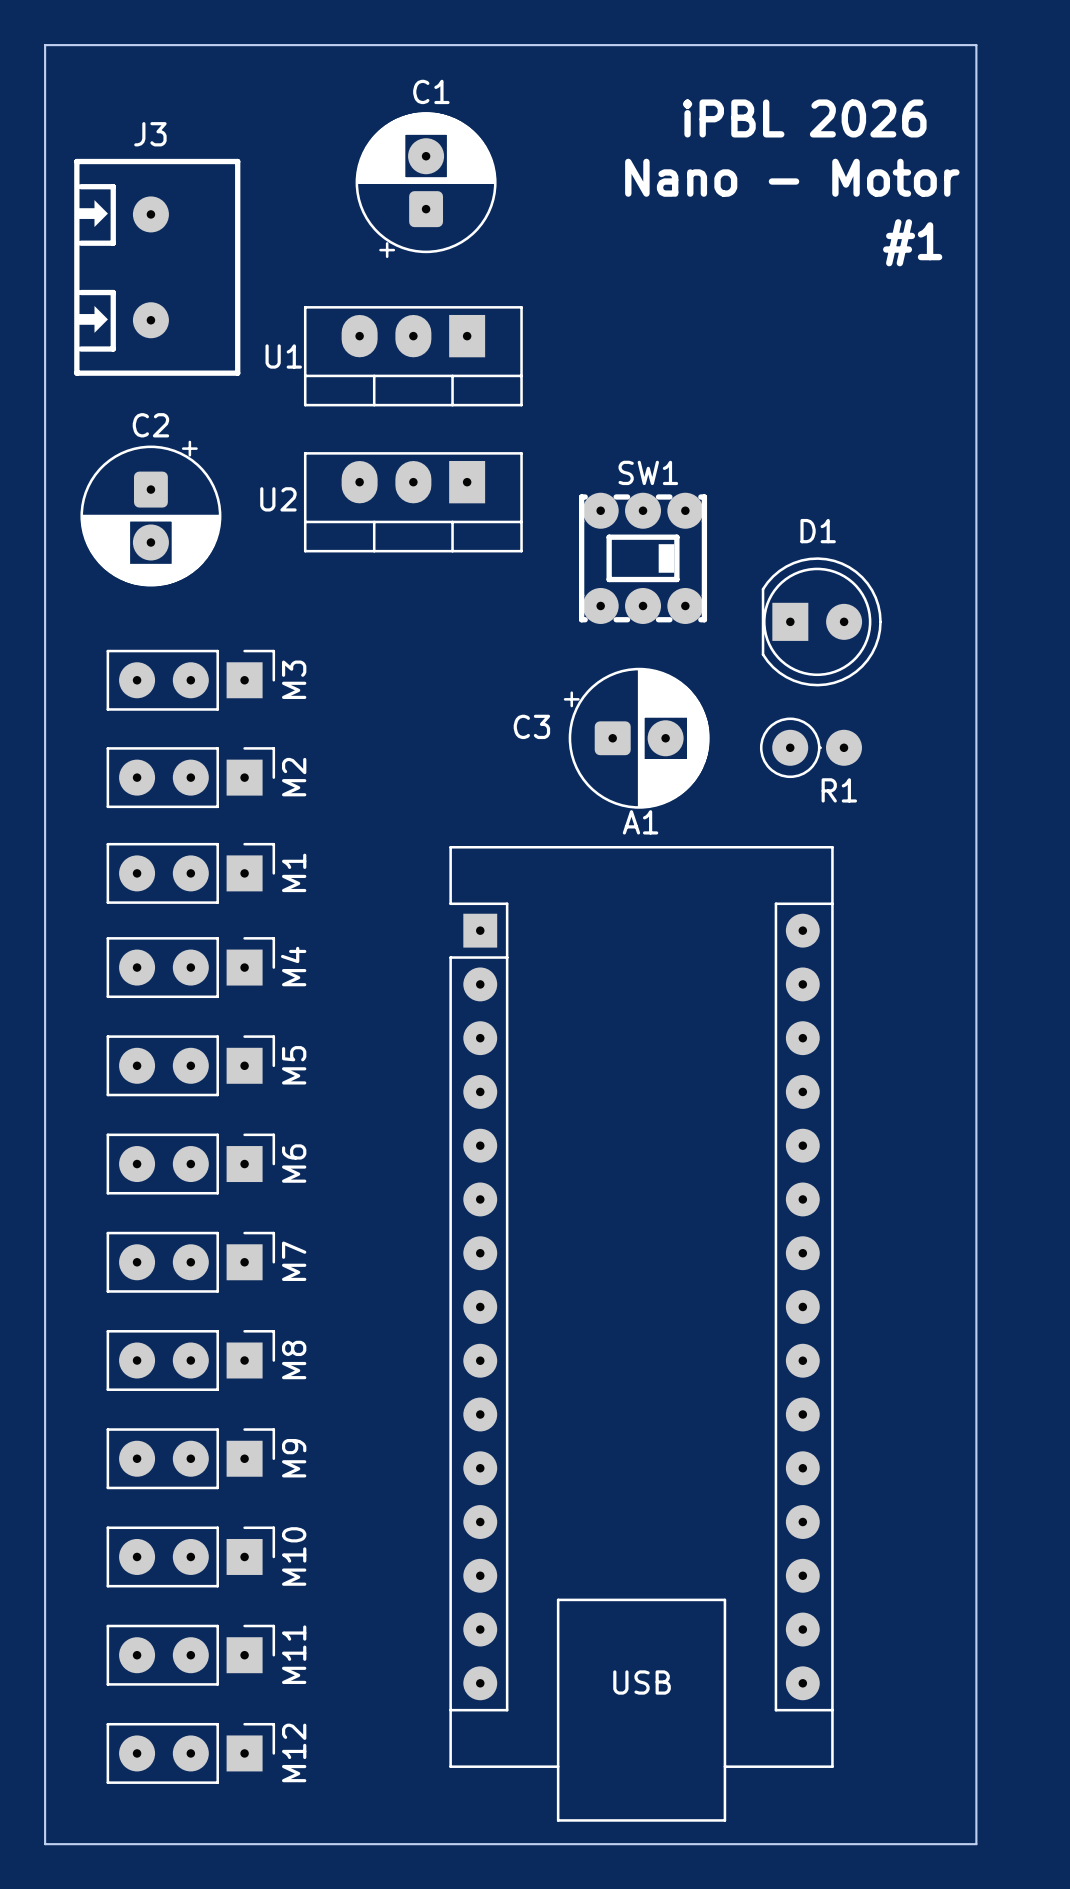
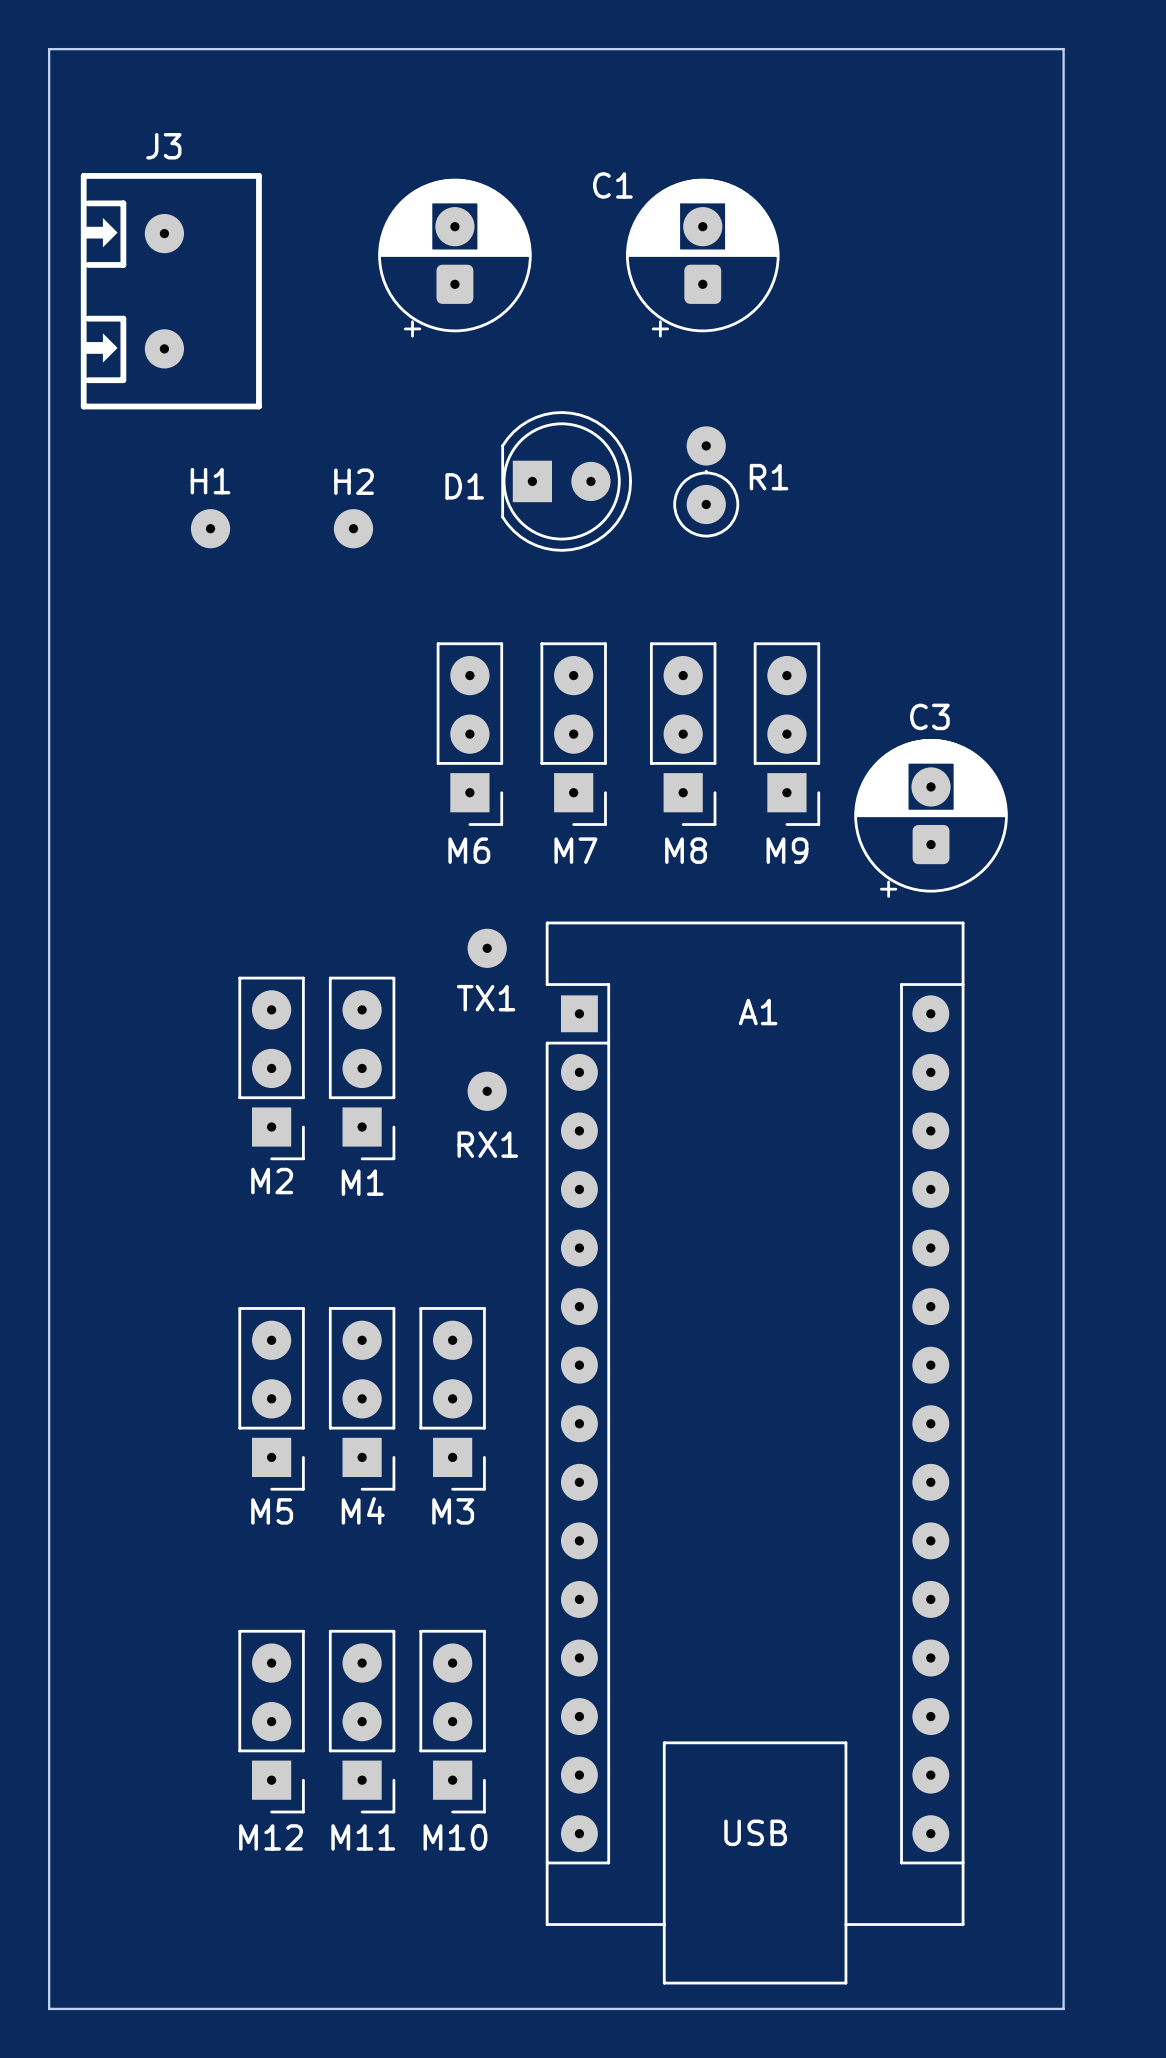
C1 name position: C1 (431, 91) -> C1 (612, 185)
text: iPBL 2026 (804, 118) -> none
text: Nano - Motor (792, 177) -> none
C1 position: (426, 185) -> (702, 258)
part: none -> (454, 258)
text: #1 (912, 242) -> none
U1: (413, 356) -> none
H1: none -> (210, 528)
H2: none -> (353, 528)
U2: (413, 502) -> none
C2: (150, 513) -> none
D1 name position: D1 (818, 531) -> D1 (464, 486)
SW1: (643, 558) -> none
D1 position: (821, 621) -> (566, 481)
M3 rotation: 0° (190, 680) -> 90° clockwise (452, 1398)
M3 position: (190, 680) -> (452, 1398)
C3 name position: C3 (531, 726) -> C3 (929, 716)
C3 rotation: 0° (636, 738) -> 90° counterclockwise (931, 818)
C3 position: (636, 738) -> (931, 818)
R1 rotation: 0° (810, 747) -> 90° counterclockwise (706, 481)
R1 position: (810, 747) -> (706, 481)
M2 rotation: 0° (190, 777) -> 90° clockwise (271, 1068)
M2 position: (190, 777) -> (271, 1068)
A1 name position: A1 (640, 822) -> A1 (758, 1012)
TX1: none -> (487, 948)
M1 rotation: 0° (190, 873) -> 90° clockwise (362, 1068)
M1 position: (190, 873) -> (362, 1068)
M4 rotation: 0° (190, 967) -> 90° clockwise (362, 1398)
M4 position: (190, 967) -> (362, 1398)
RX1: none -> (487, 1091)
M5 rotation: 0° (190, 1065) -> 90° clockwise (271, 1398)
M5 position: (190, 1065) -> (271, 1398)
M6 rotation: 0° (190, 1164) -> 90° clockwise (469, 734)
M6 position: (190, 1164) -> (469, 734)
M7 rotation: 0° (190, 1262) -> 90° clockwise (573, 734)
M7 position: (190, 1262) -> (573, 734)
A1 position: (641, 1333) -> (755, 1453)
M8 rotation: 0° (190, 1360) -> 90° clockwise (683, 734)
M8 position: (190, 1360) -> (683, 734)
M9 rotation: 0° (190, 1458) -> 90° clockwise (786, 734)
M9 position: (190, 1458) -> (786, 734)
M10 rotation: 0° (190, 1556) -> 90° clockwise (452, 1721)
M10 position: (190, 1556) -> (452, 1721)
M11 rotation: 0° (190, 1655) -> 90° clockwise (362, 1721)
M11 position: (190, 1655) -> (362, 1721)
M12 rotation: 0° (190, 1753) -> 90° clockwise (271, 1721)
M12 position: (190, 1753) -> (271, 1721)

